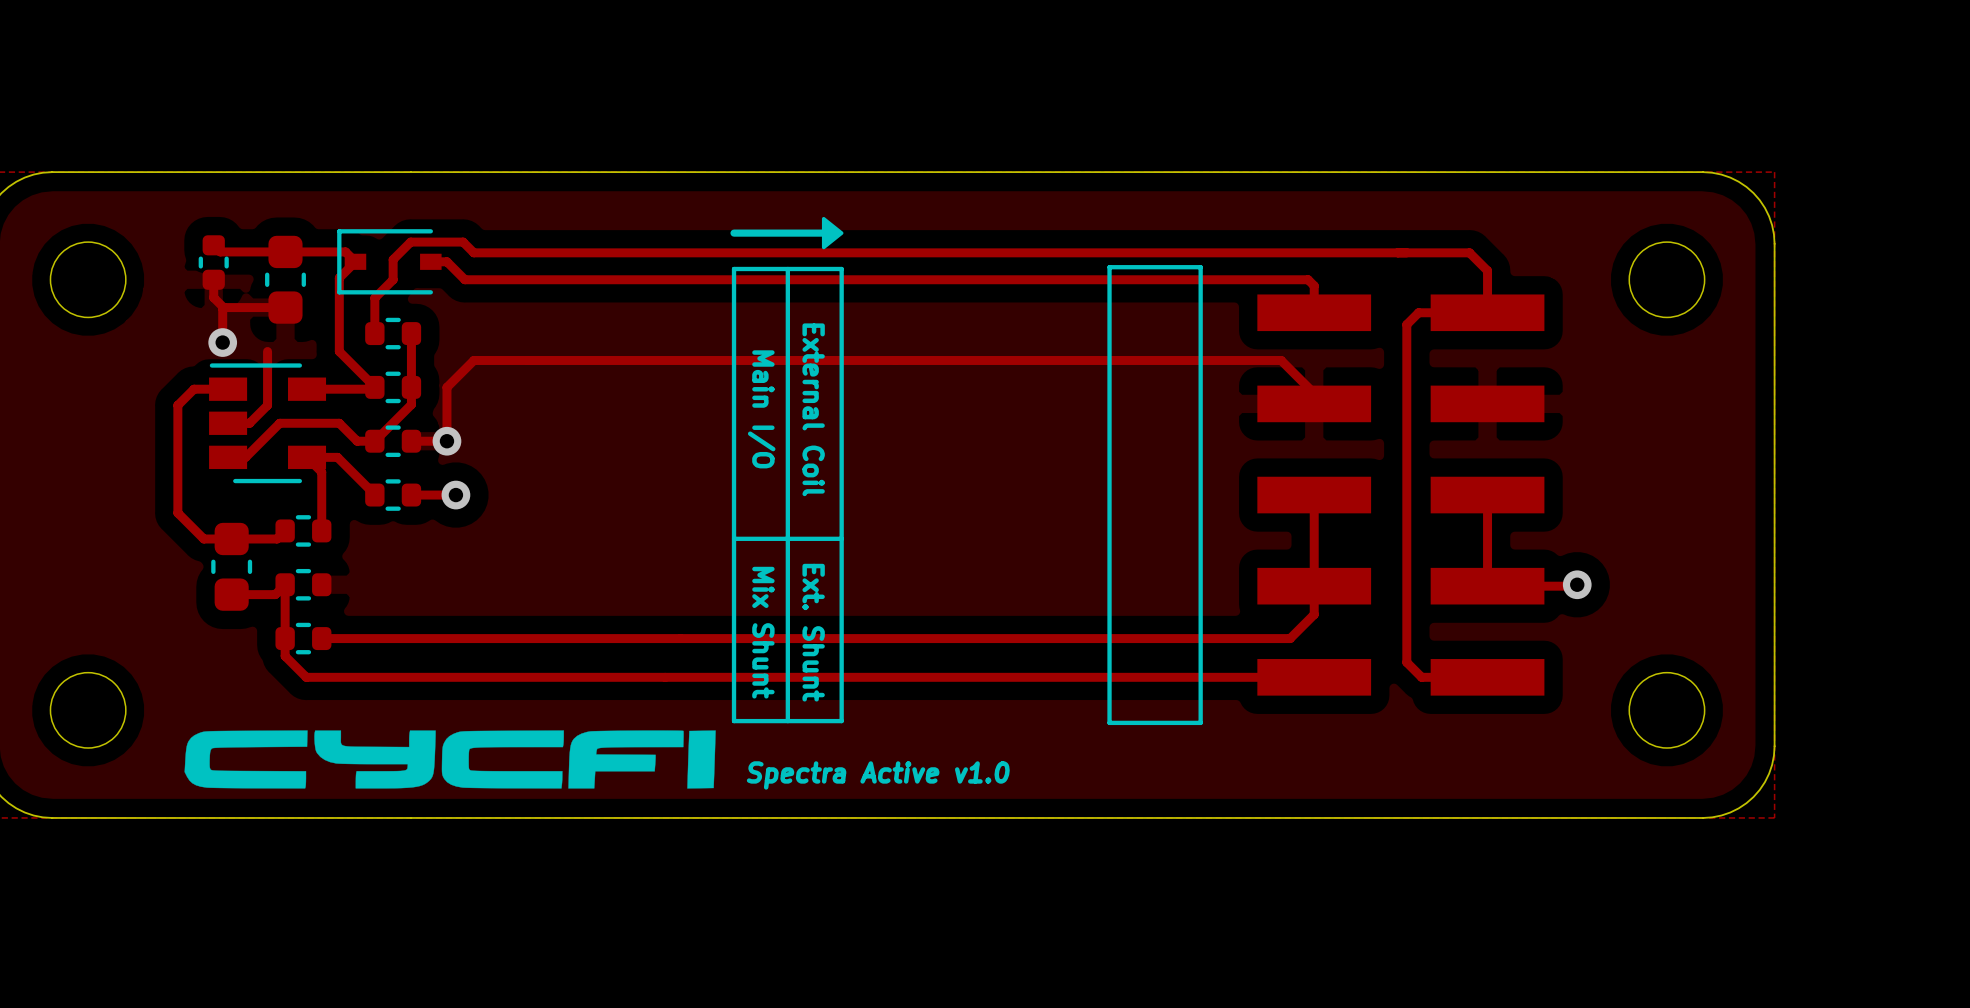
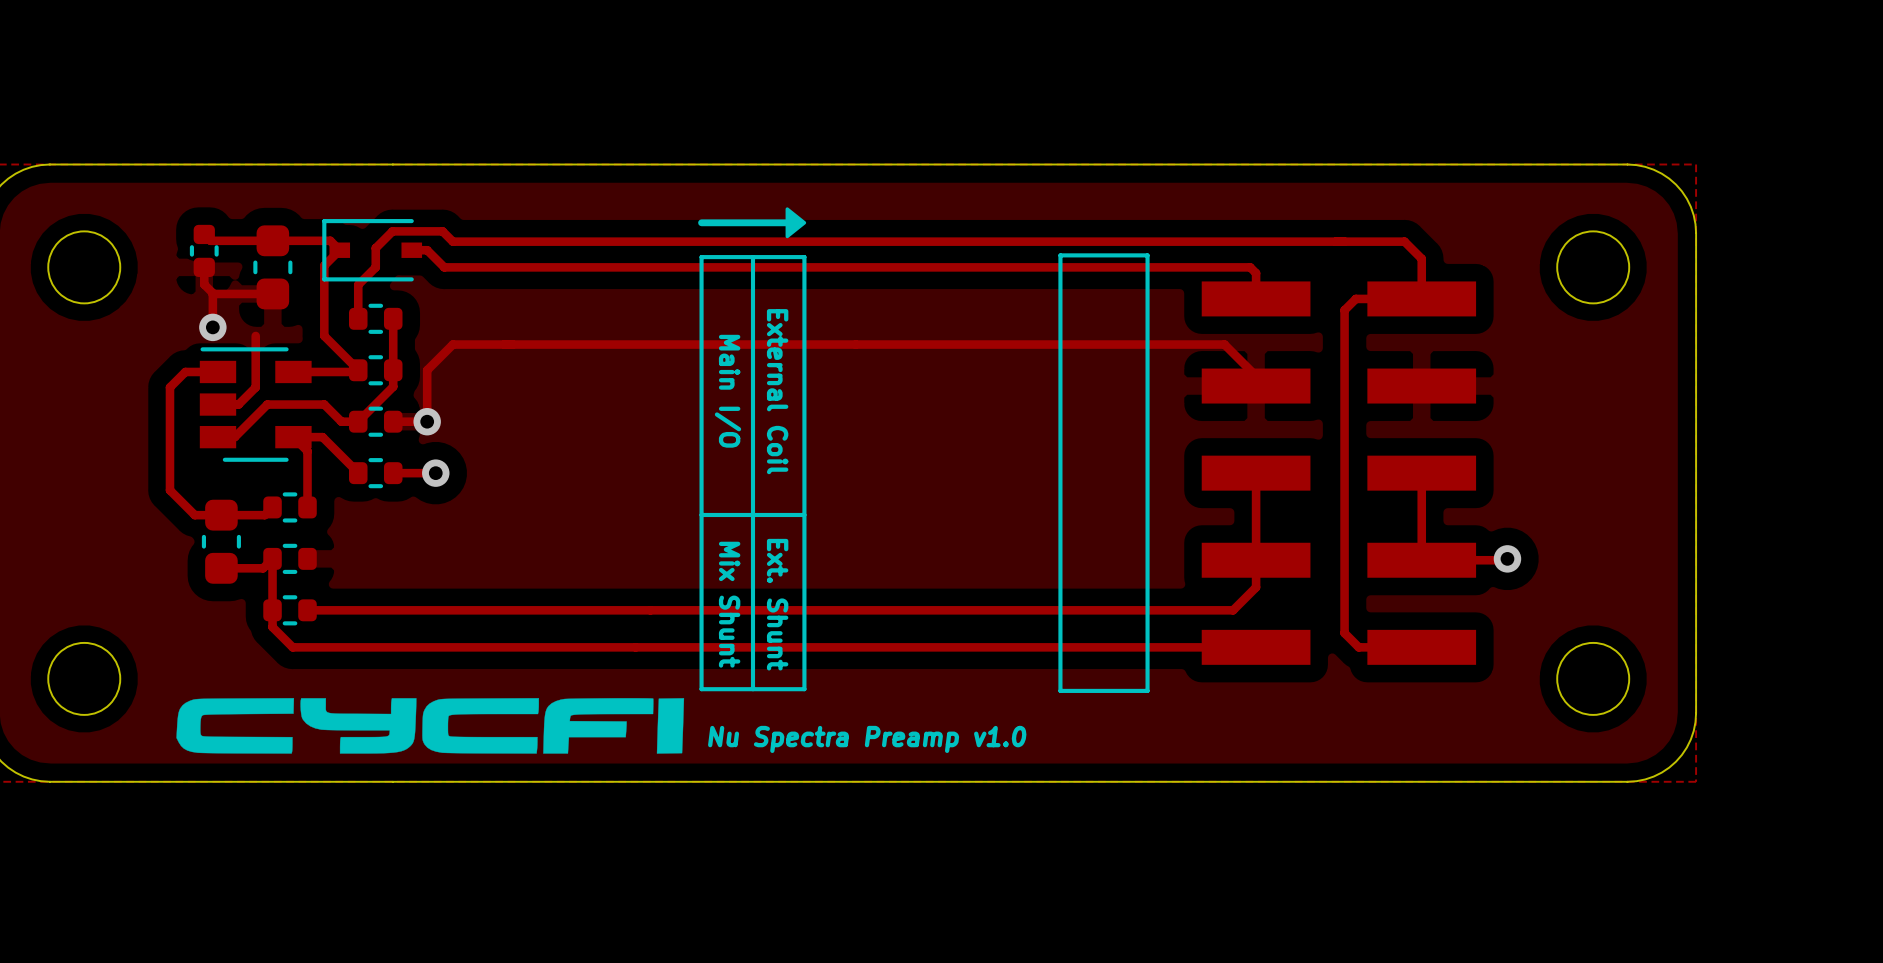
text: Spectra Active v1.0 (878, 775) -> Nu Spectra Preamp v1.0 (867, 739)

